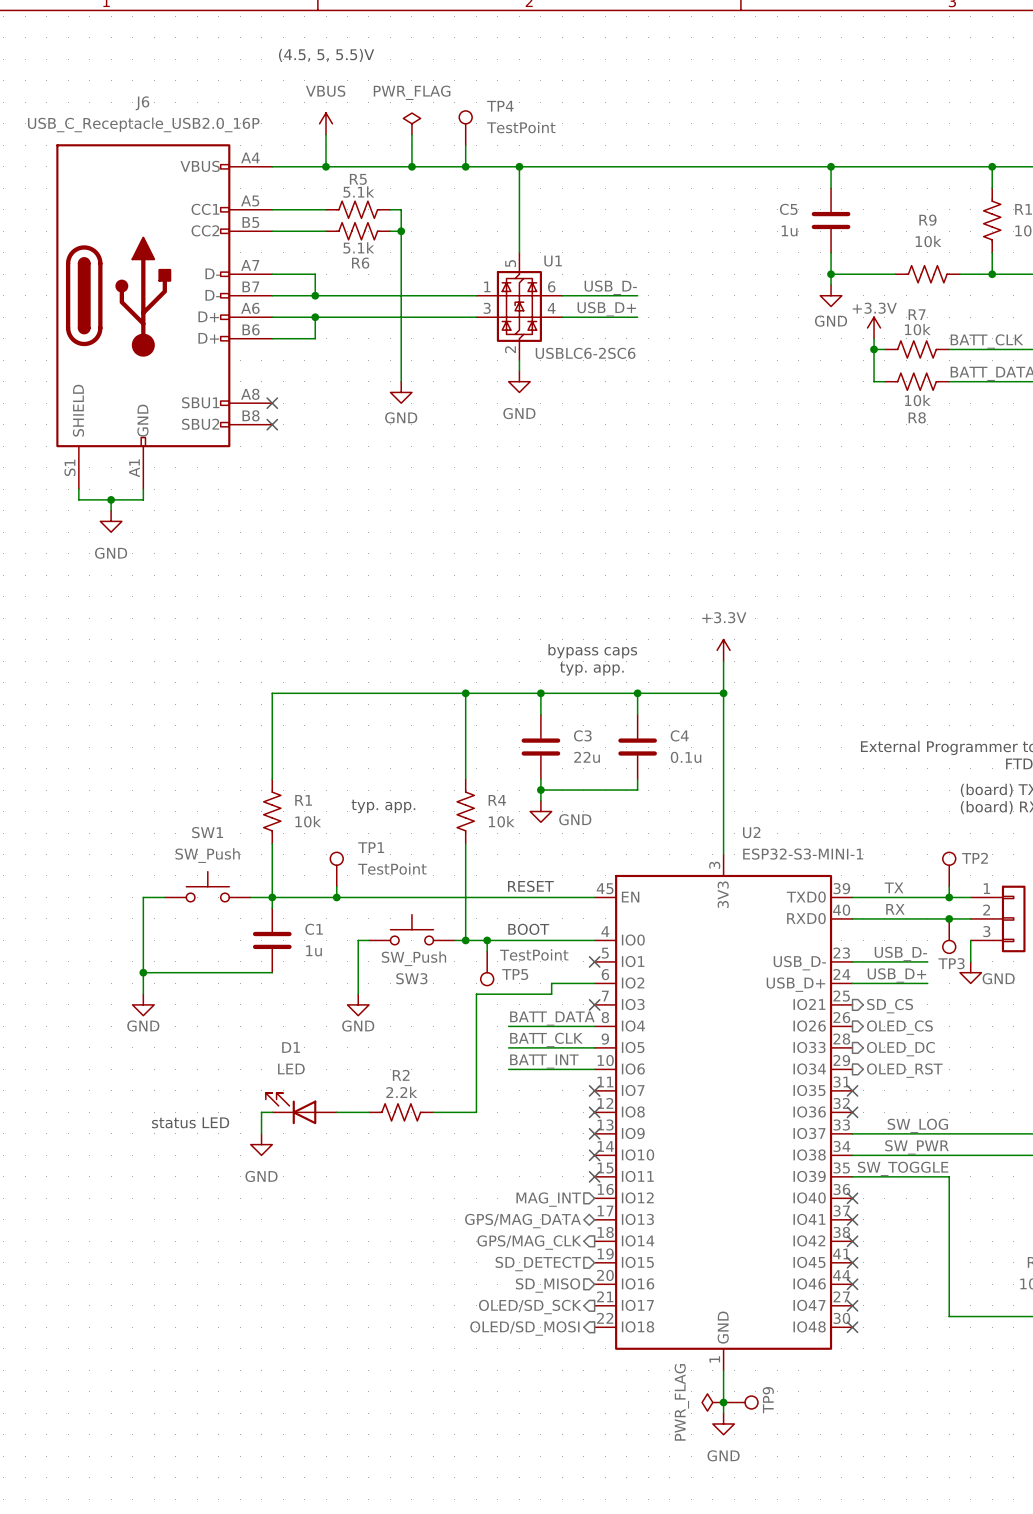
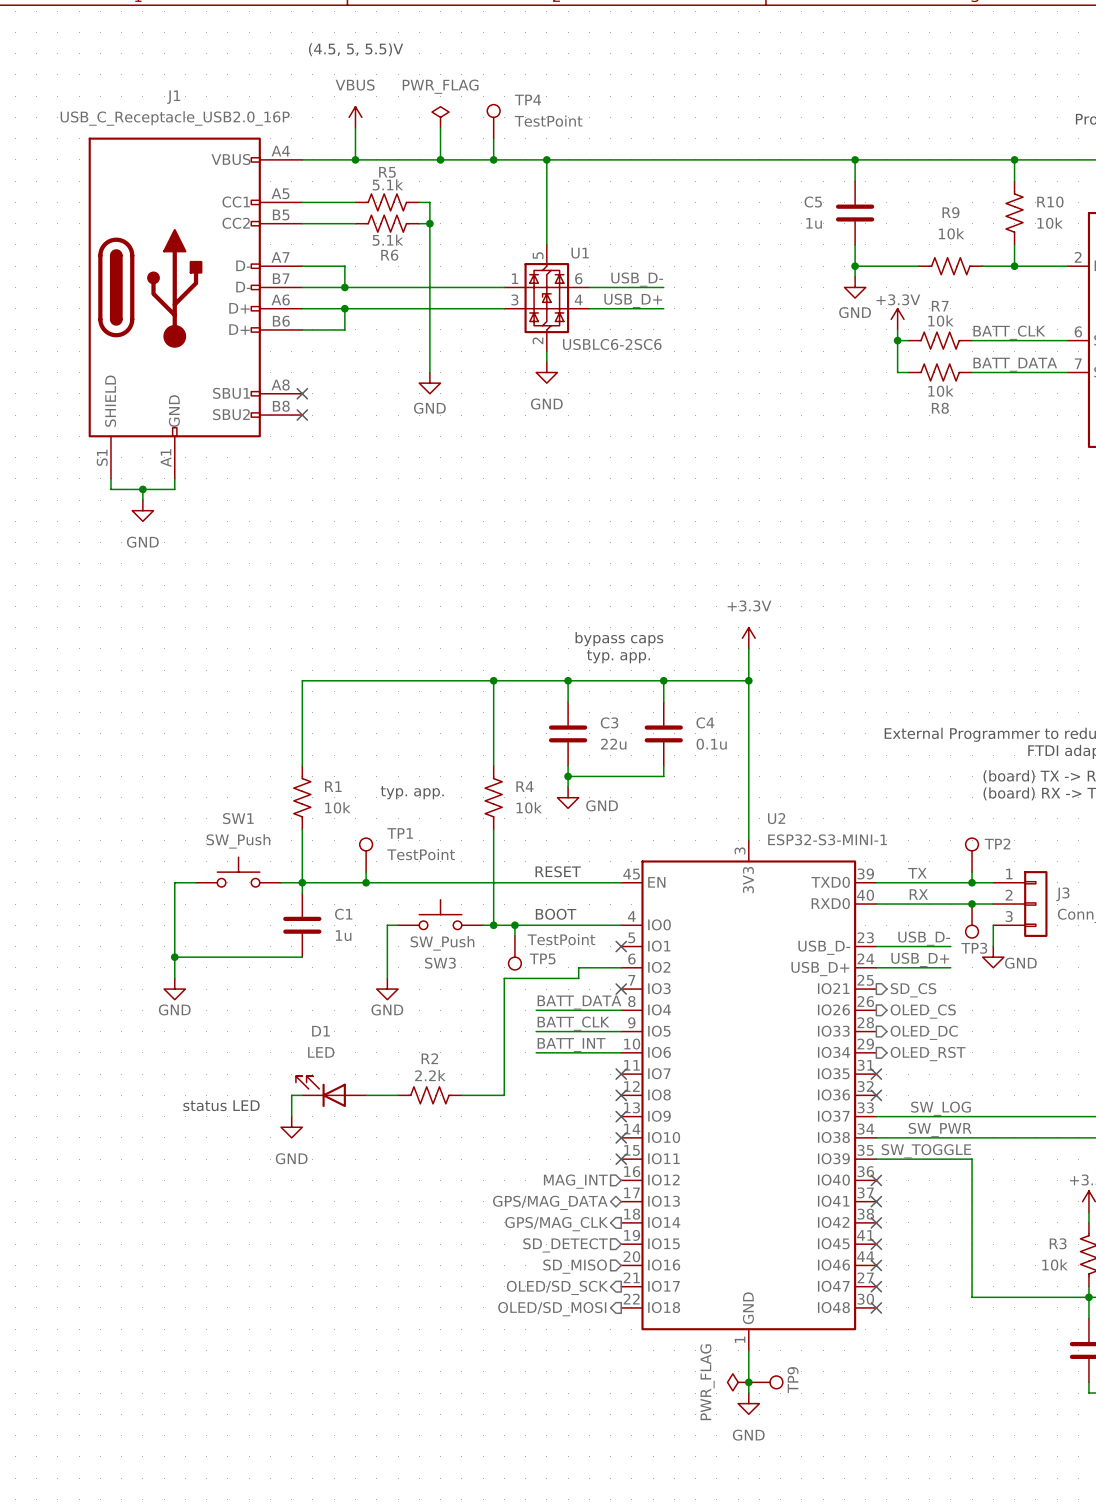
J6 name: J6 (142, 103) -> J1 (173, 97)

